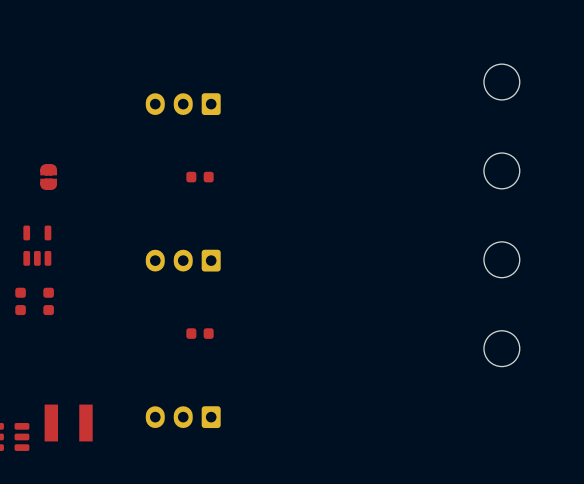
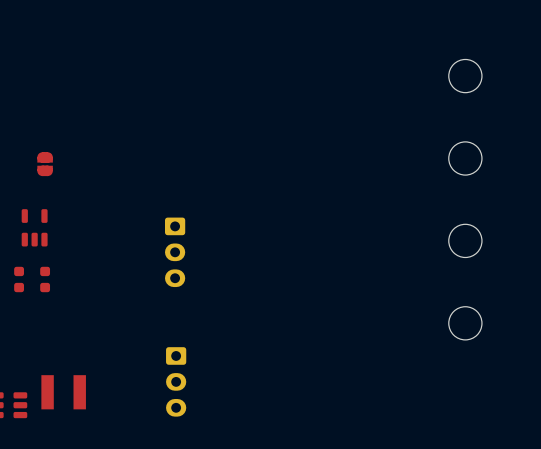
part: (183, 104) -> none
part: (200, 177) -> none
part rotation: 0° (183, 260) -> 90° counterclockwise (175, 252)
part: (200, 333) -> none
part rotation: 0° (183, 417) -> 90° counterclockwise (176, 381)

